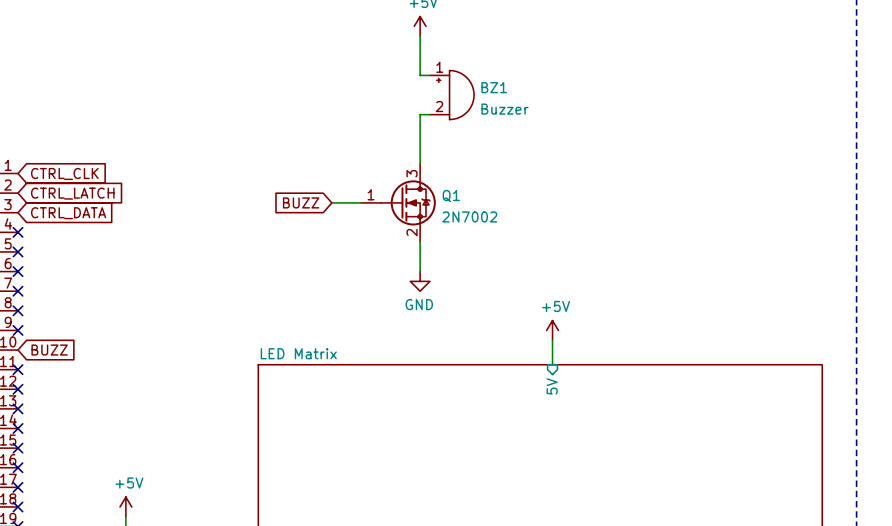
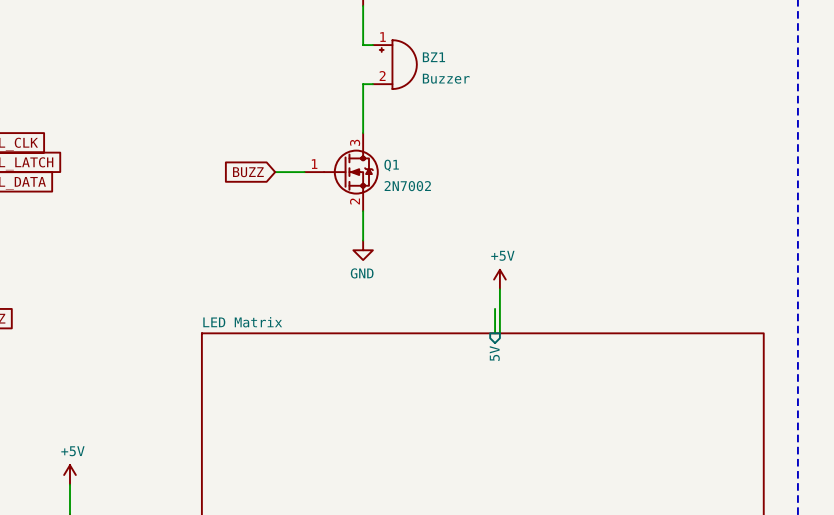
wire: none -> (499, 289) (499, 333)
power symbol position: +5V (552, 330) -> +5V (499, 279)

